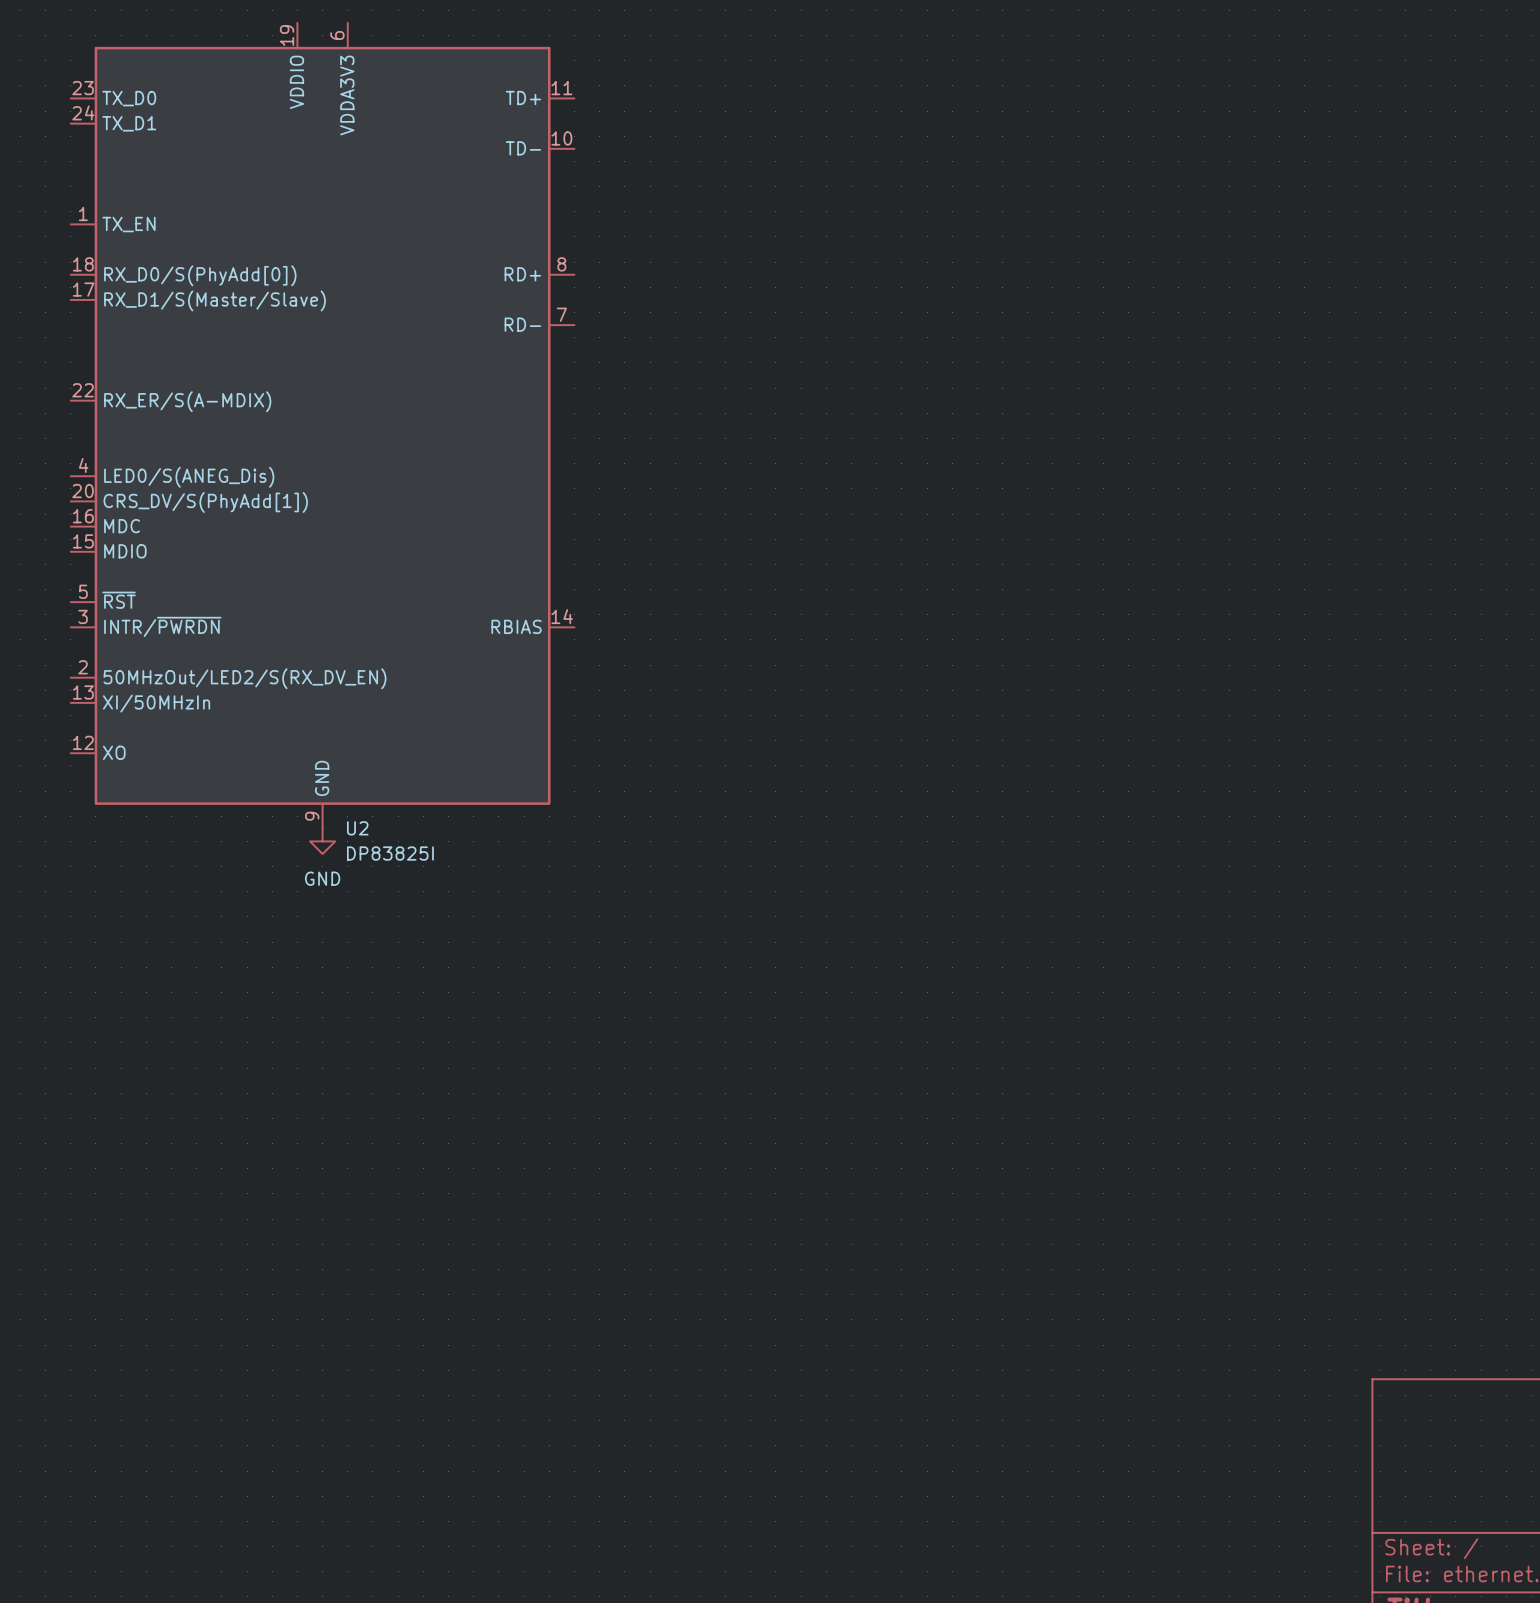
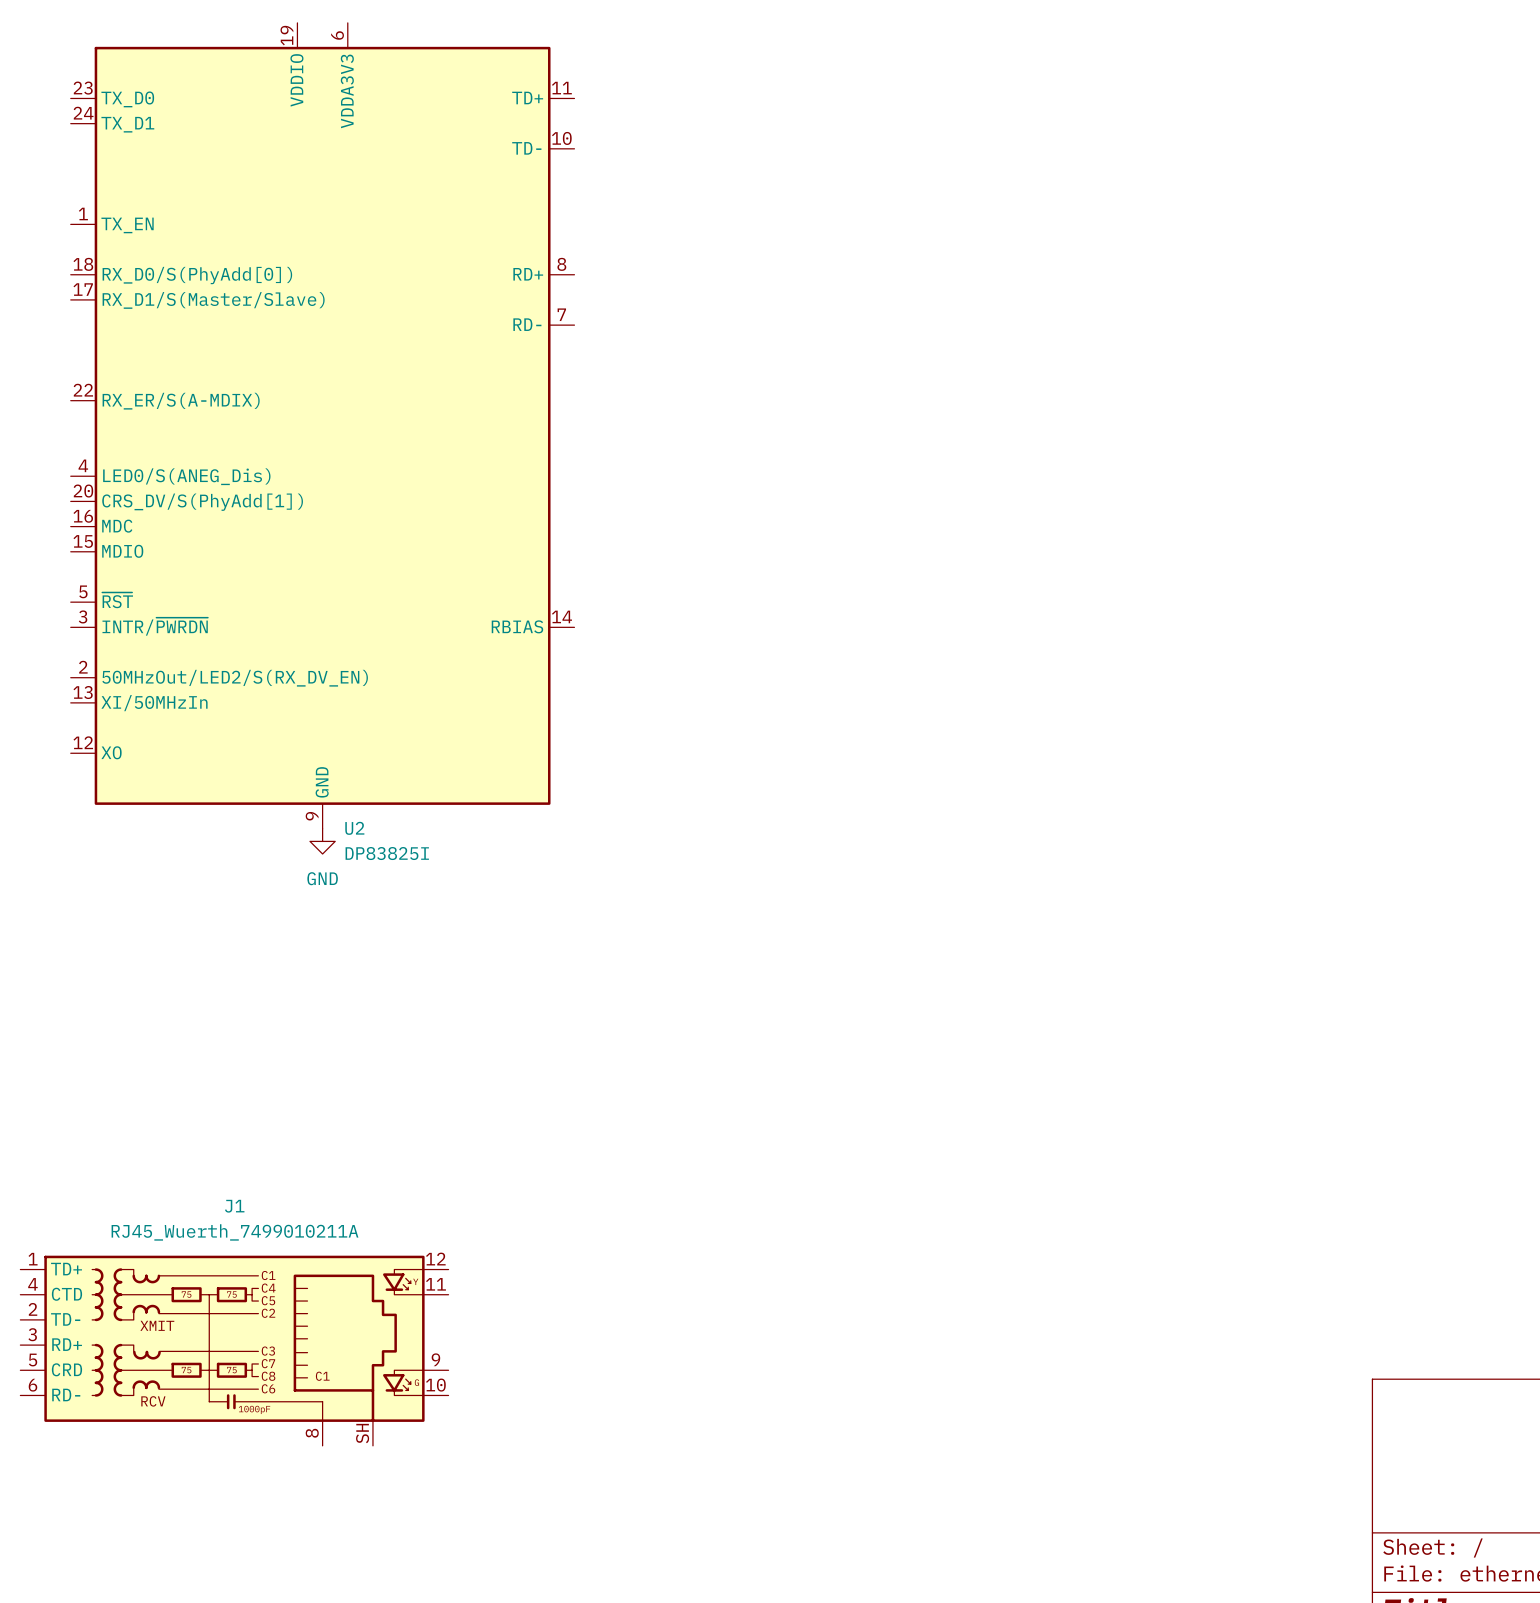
J1: none -> RJ45_Wuerth_7499010211A (234, 1350)

